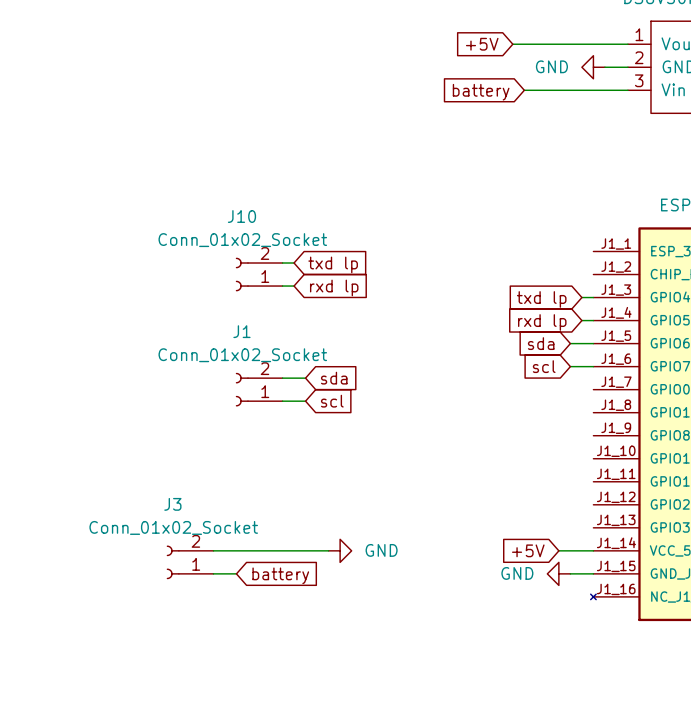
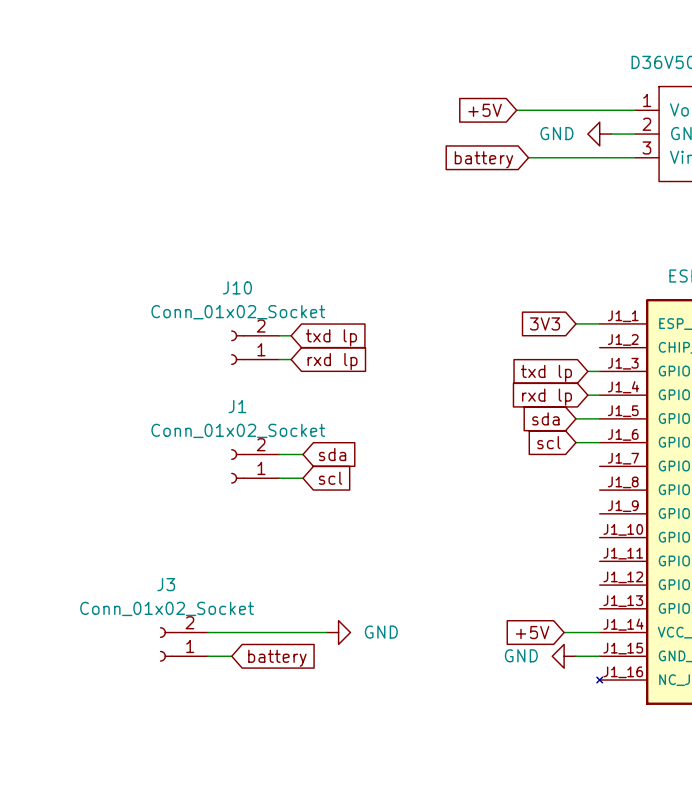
global label: none -> 3V3 (545, 323)
wire: none -> (575, 323) (599, 323)

